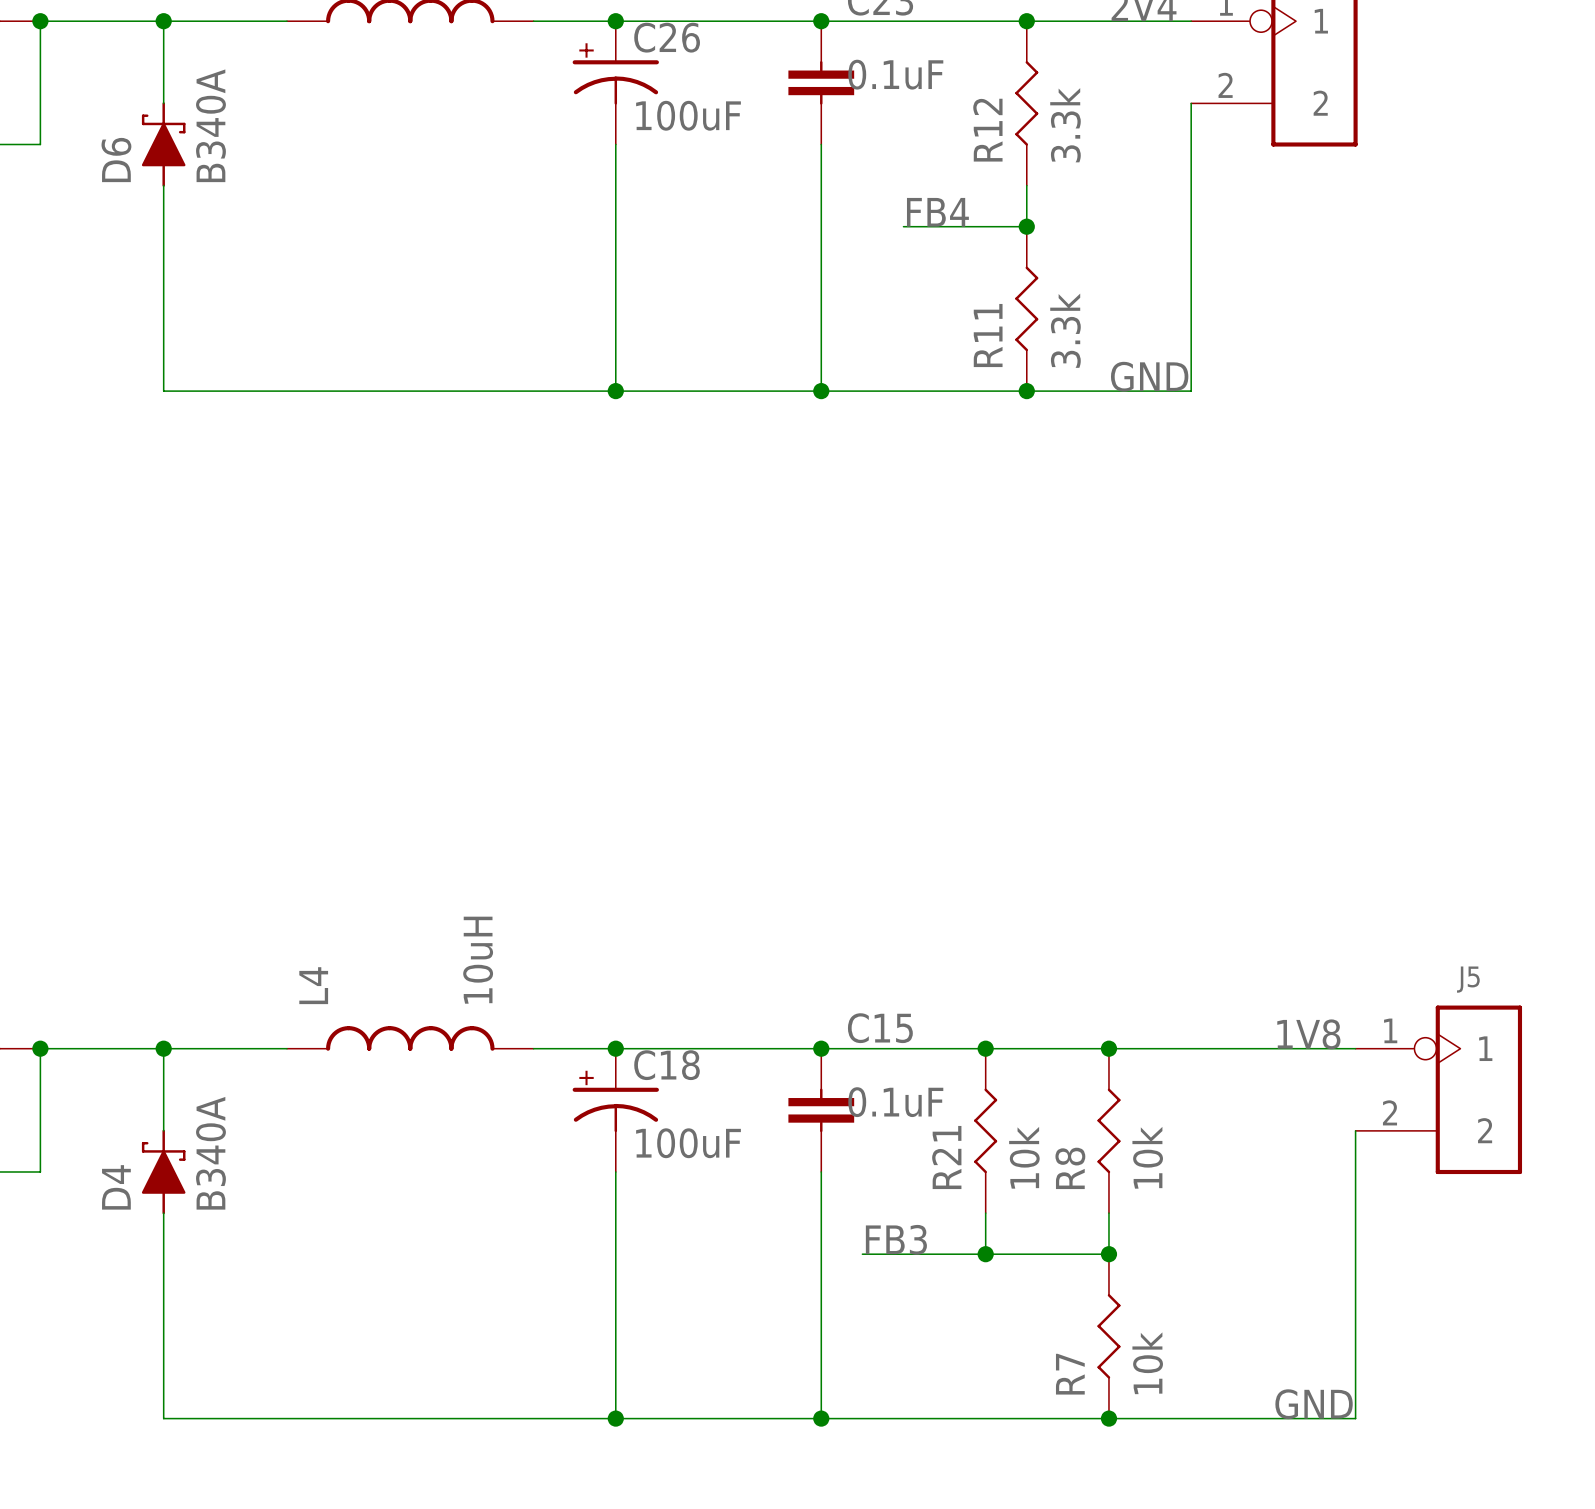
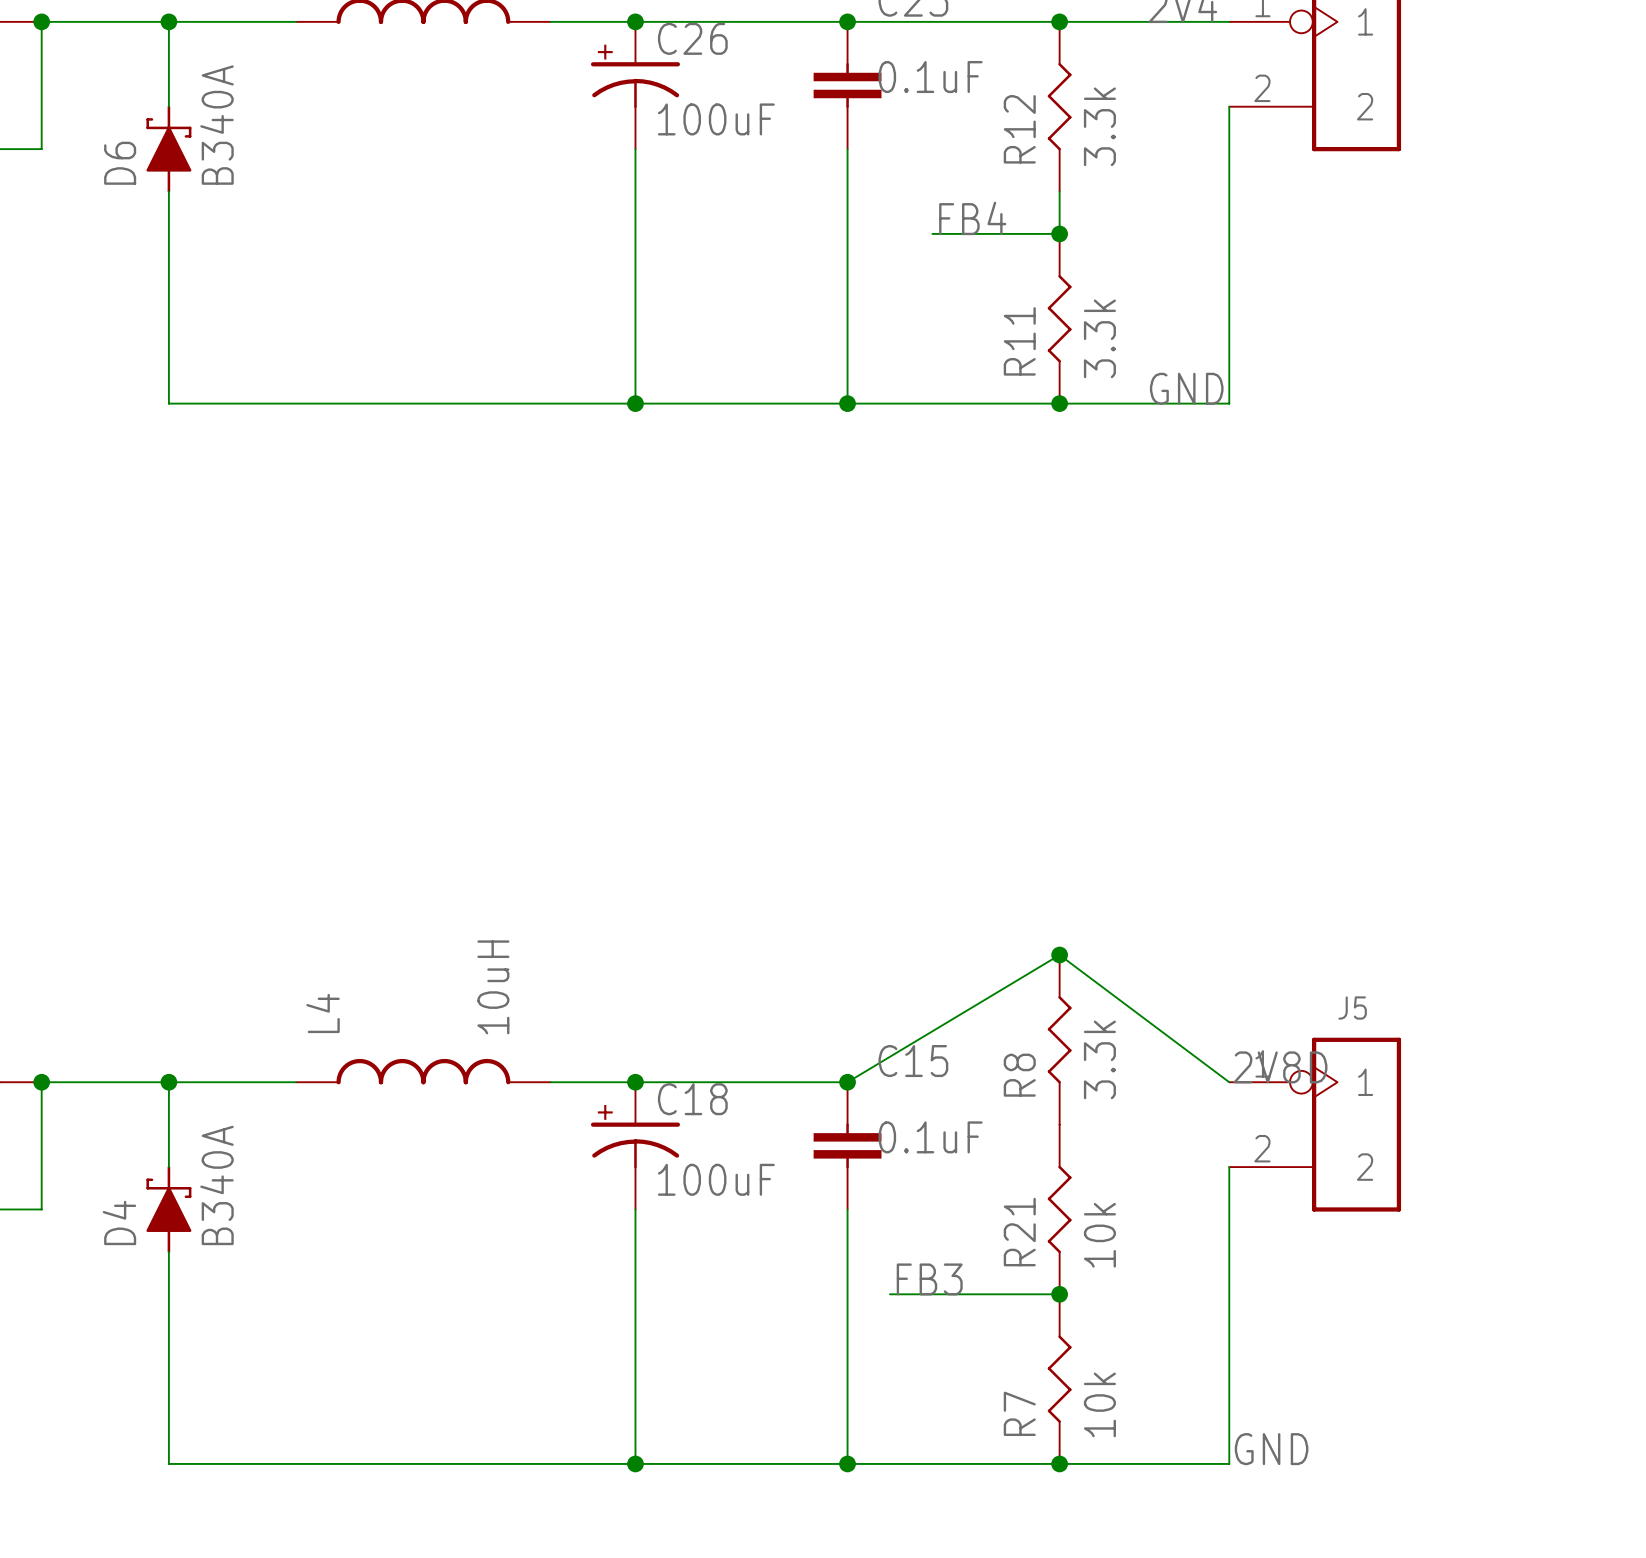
junction: none -> (1059, 954)
label: none -> 2V8D (1280, 1067)
label: 1V8 (1308, 1034) -> none
wire: (821, 1048) (1355, 1048) -> (847, 1082) (1059, 954) (1229, 1082)
junction: (985, 1048) -> none
junction: (1108, 1048) -> none
J5 position: (1438, 1089) -> (1315, 1124)
R21 position: (985, 1130) -> (1059, 1209)
R8 position: (1108, 1130) -> (1059, 1039)
wire: (1355, 1130) (1355, 1418) (1191, 1418) -> (1229, 1167) (1229, 1463)
R8 value: 10k (1147, 1157) -> 3.3k (1099, 1059)
wire: (985, 1213) (985, 1254) -> none
wire: (1108, 1213) (1108, 1254) (1026, 1254) -> none
junction: (985, 1254) -> none
junction: none -> (1059, 1294)
junction: (1108, 1254) -> none
R7 position: (1108, 1336) -> (1059, 1379)
label position: GND (1314, 1404) -> GND (1271, 1449)
junction position: (1108, 1418) -> (1059, 1463)

